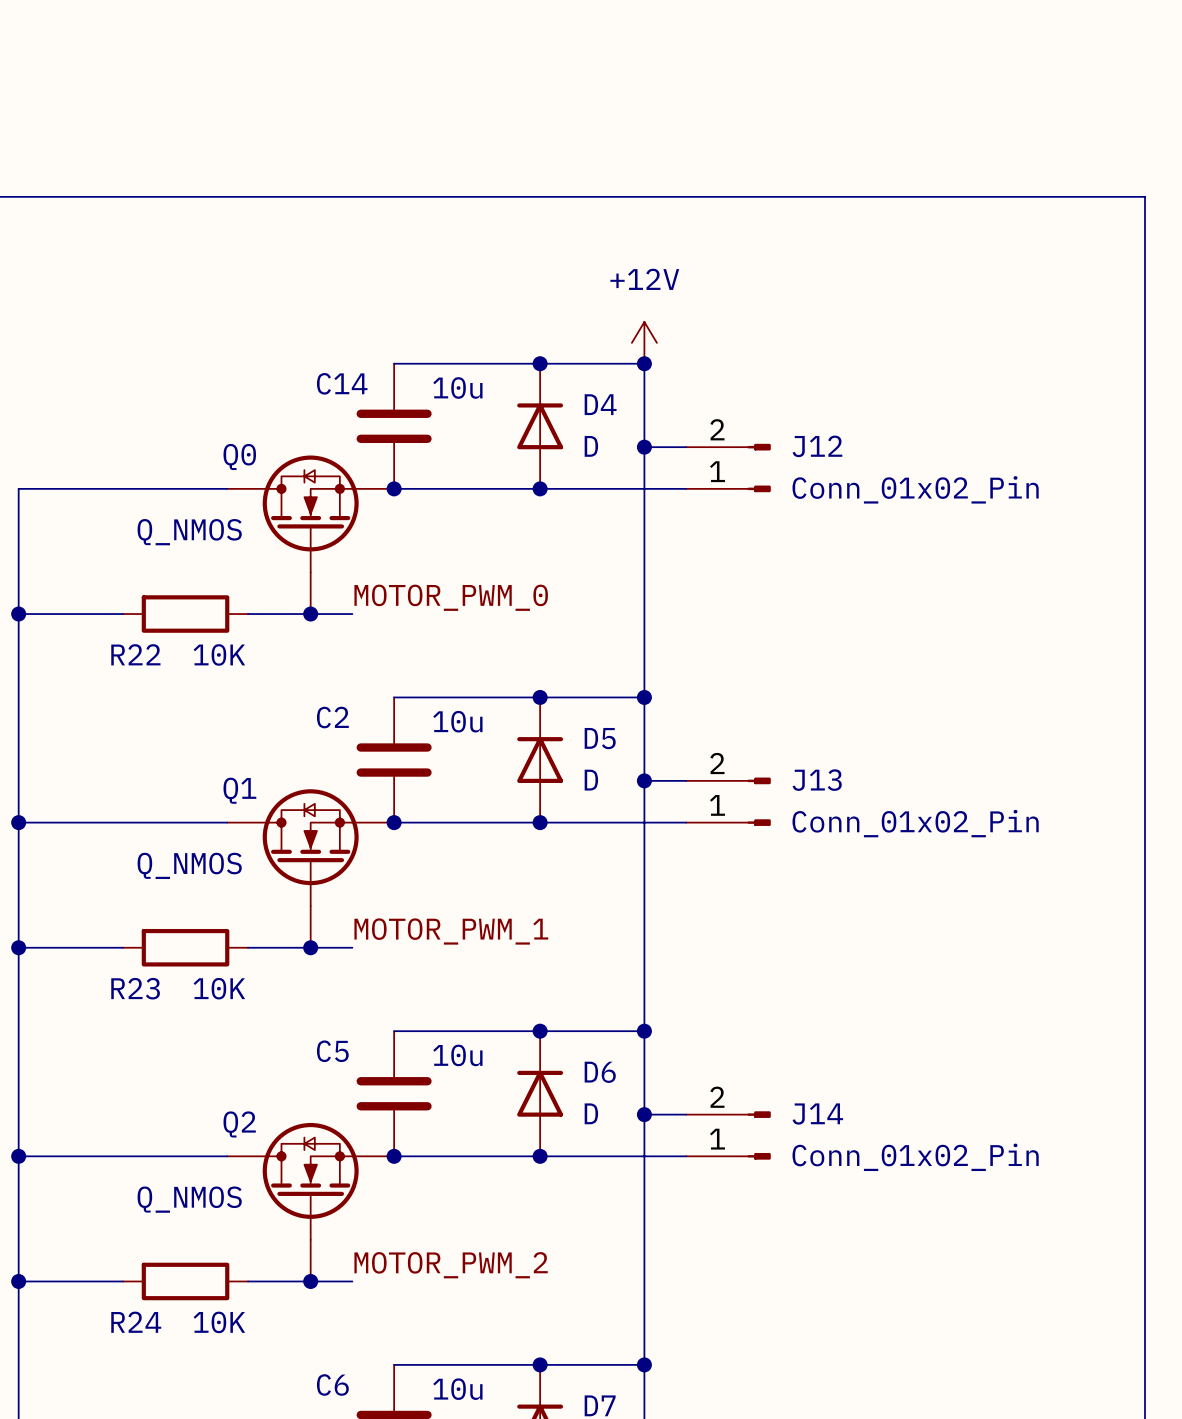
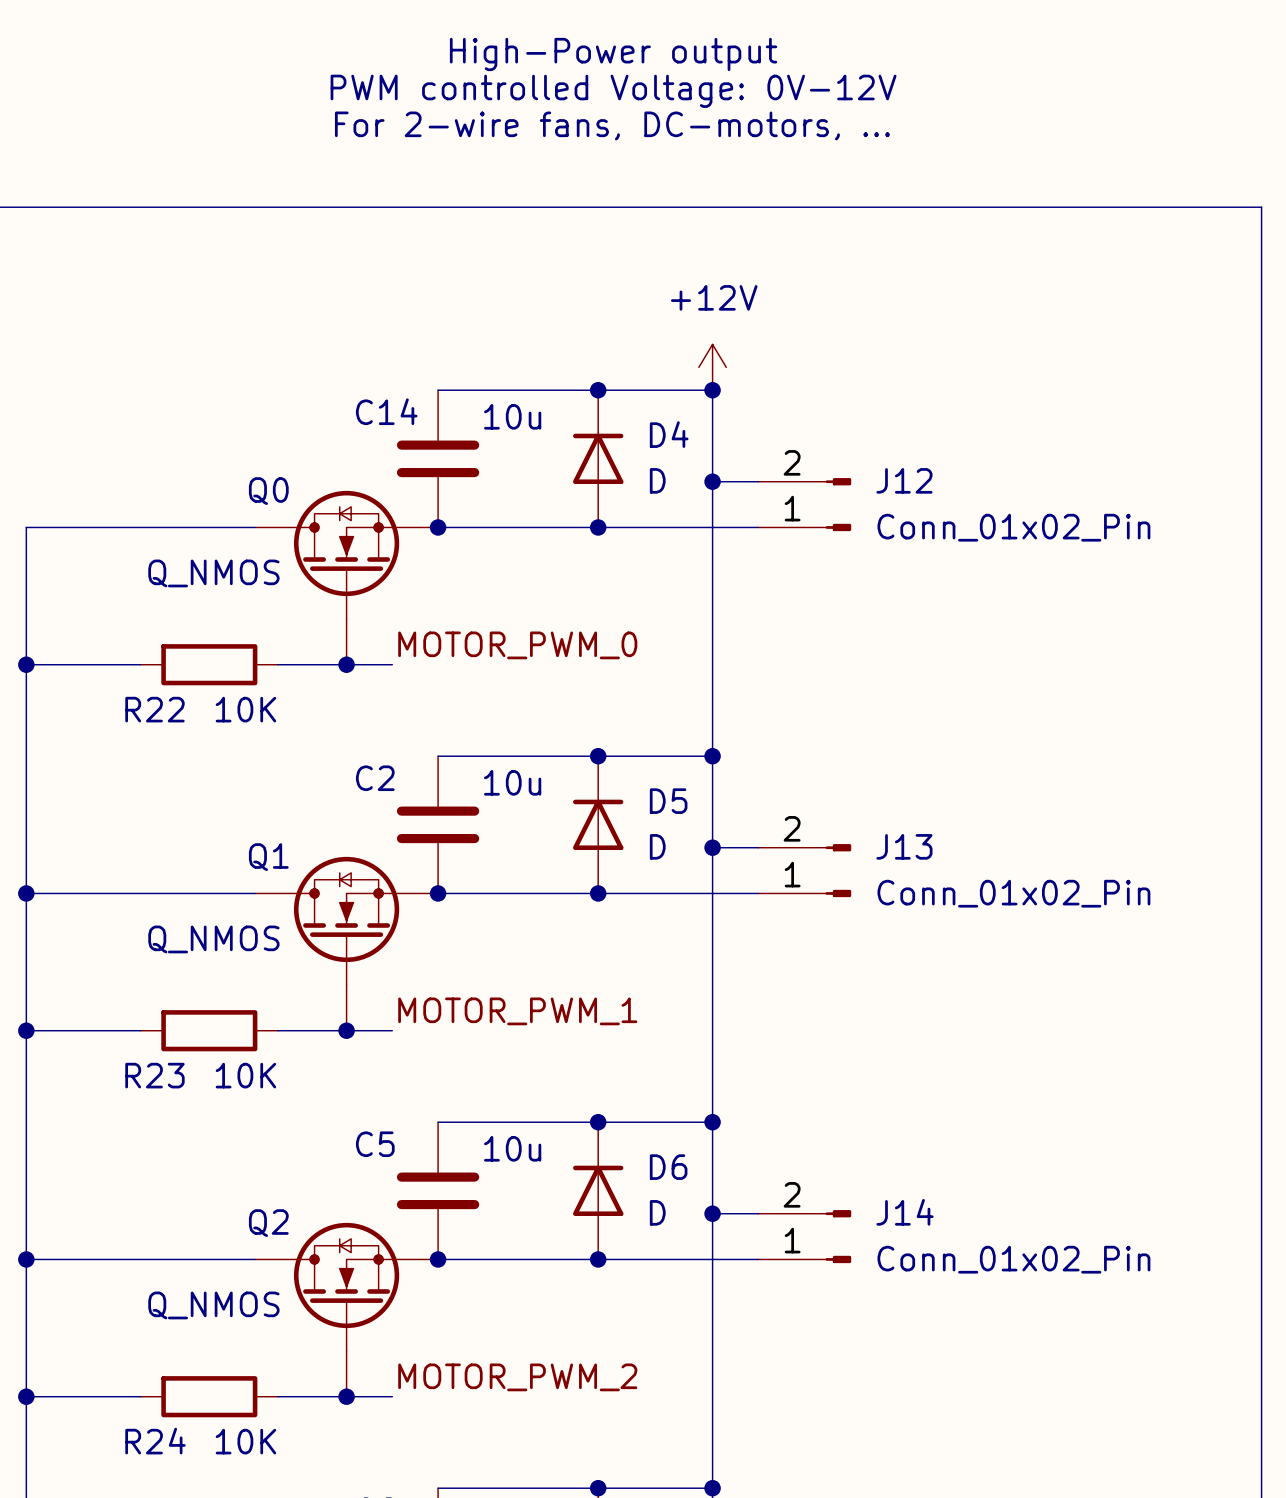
text: none -> High-Power output (613, 54)
text: none -> PWM controlled Voltage: 0V-12V (613, 91)
text: none -> For 2-wire fans, DC-motors, ... (612, 125)

